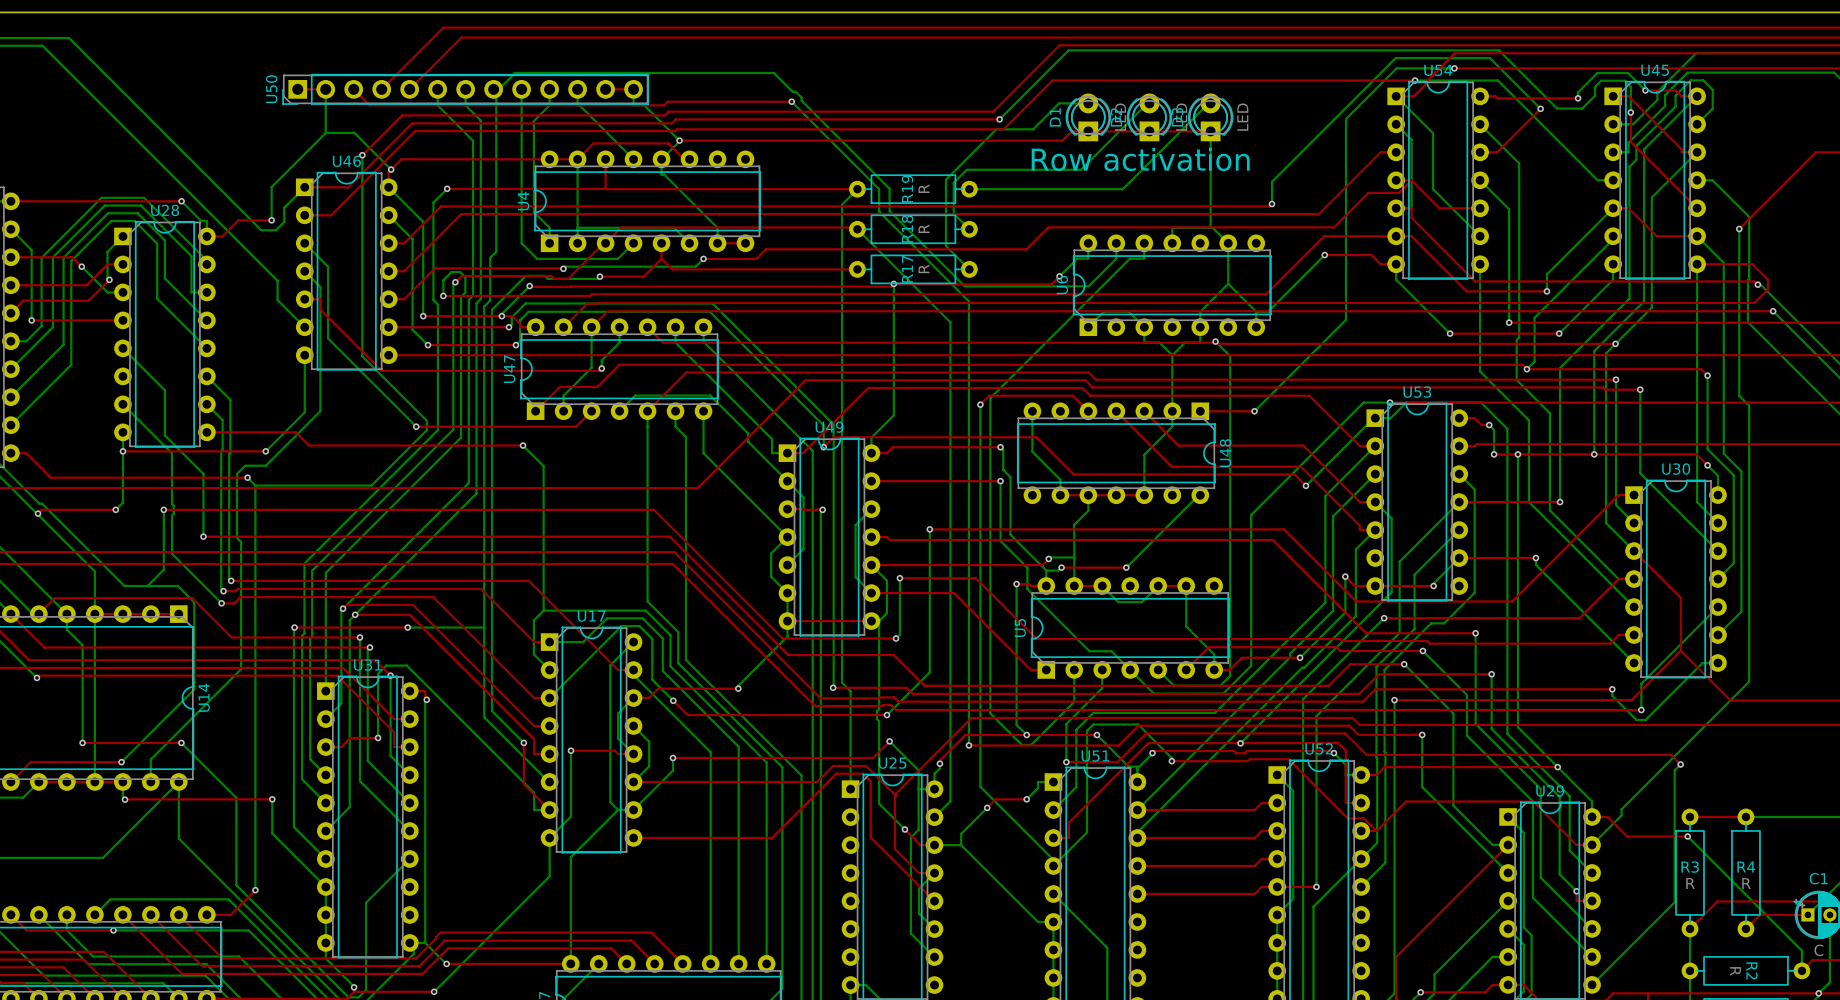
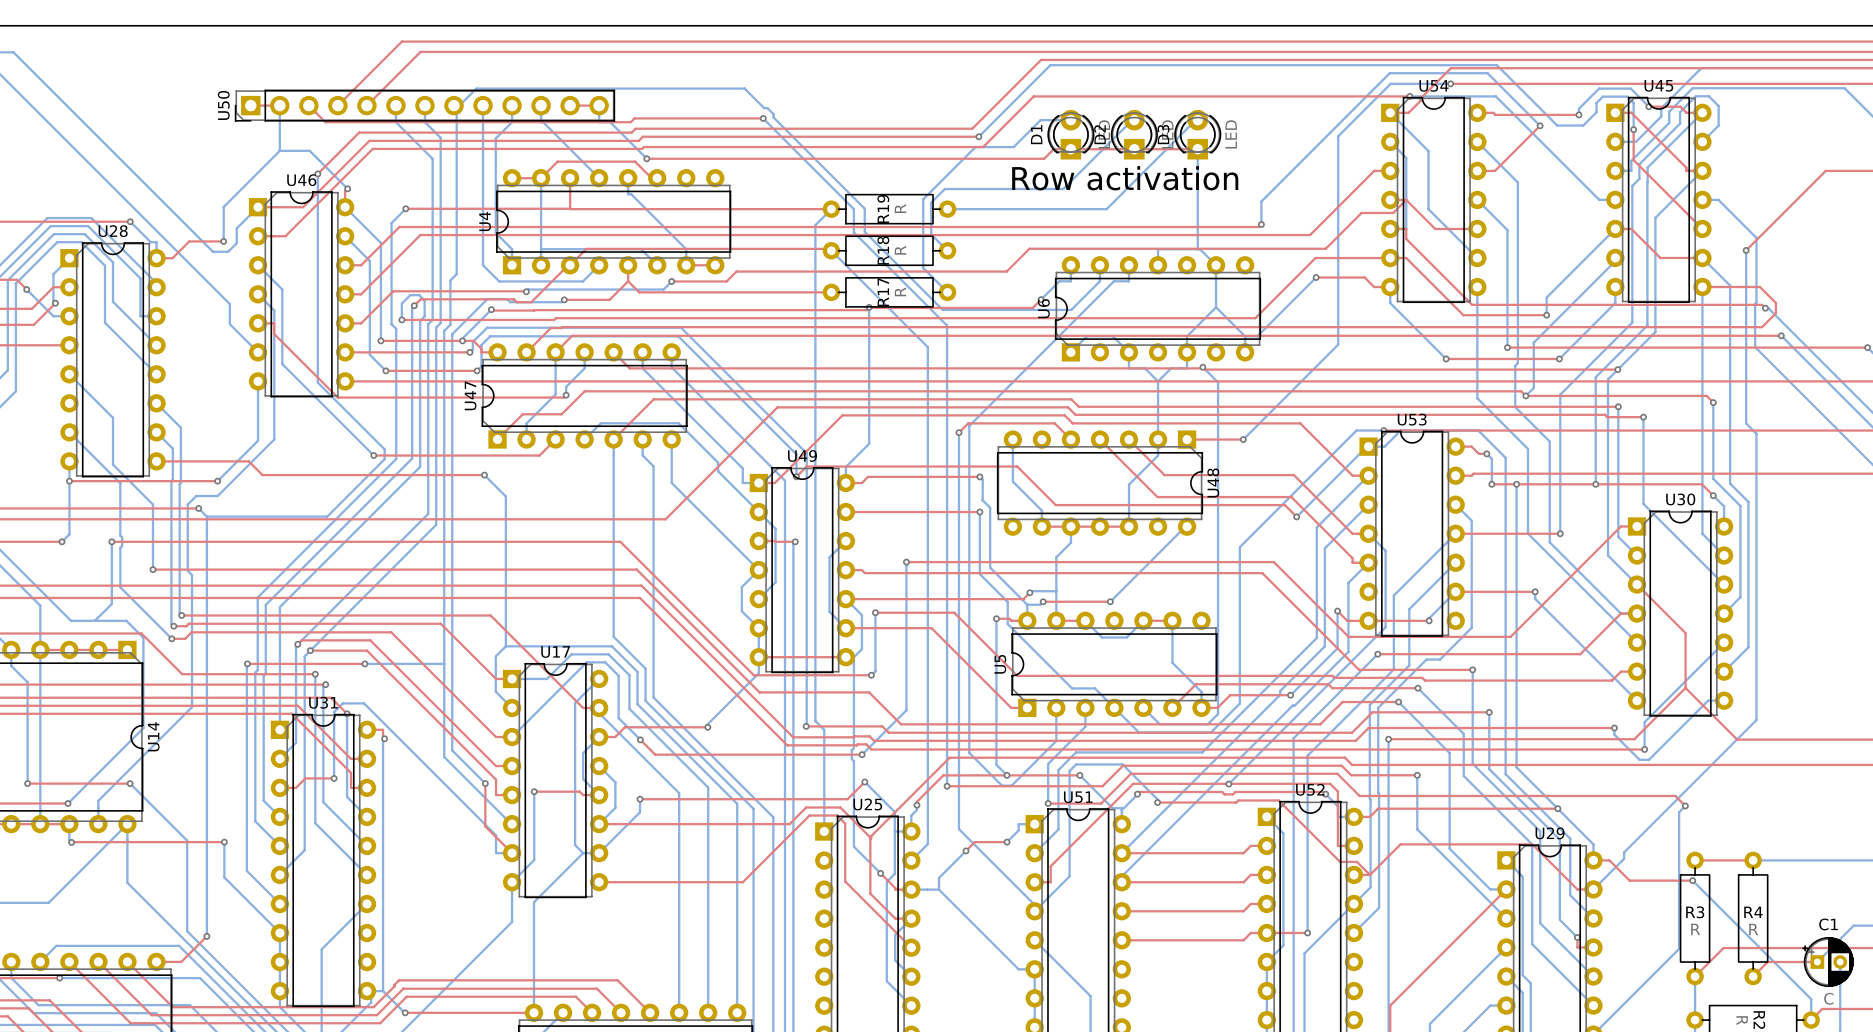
bottom track: (679, 140) (661, 159) -> none
top track: (549, 159) (401, 159) (391, 169) -> none

